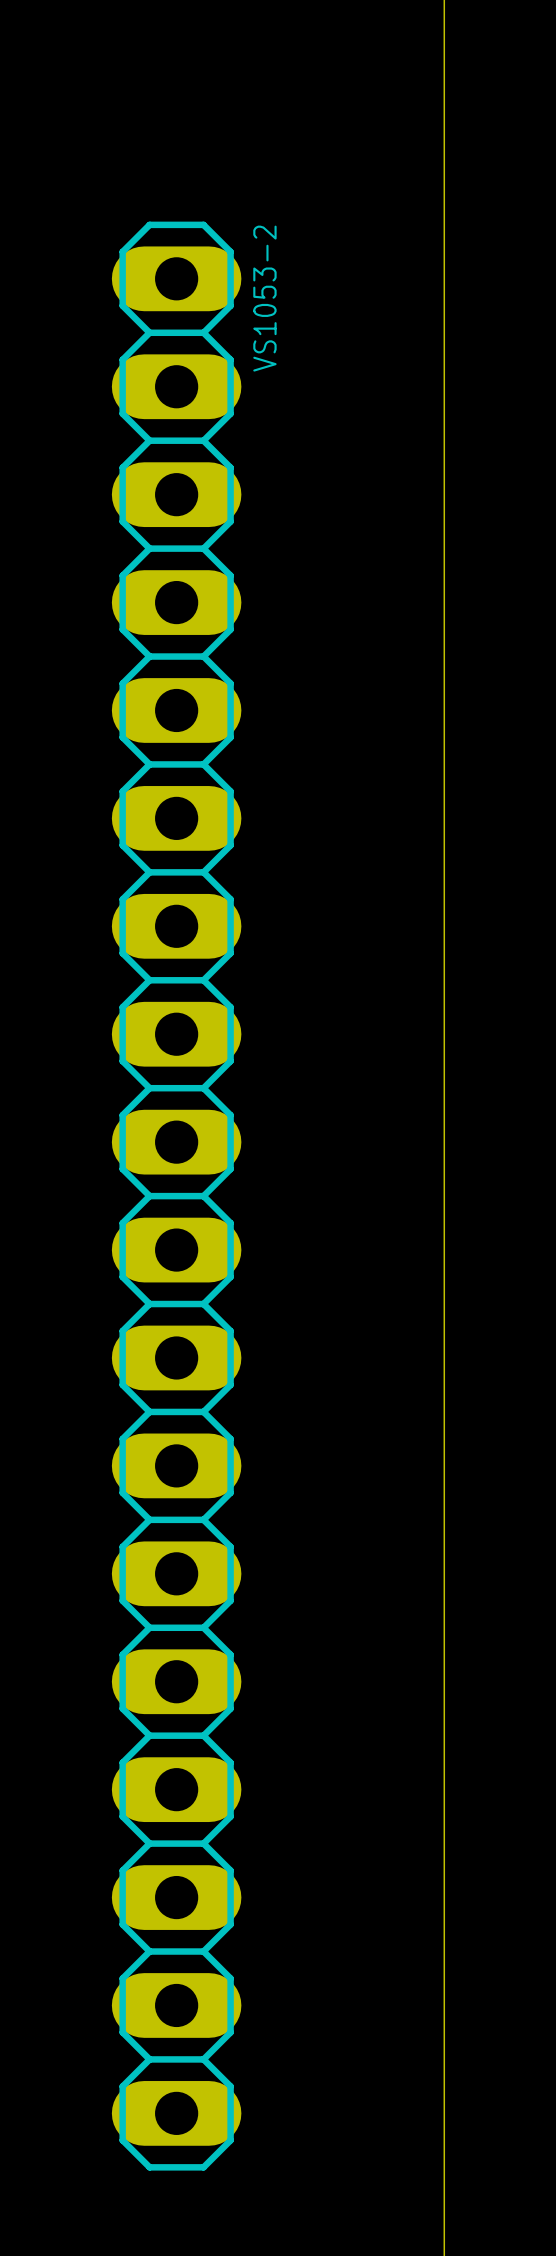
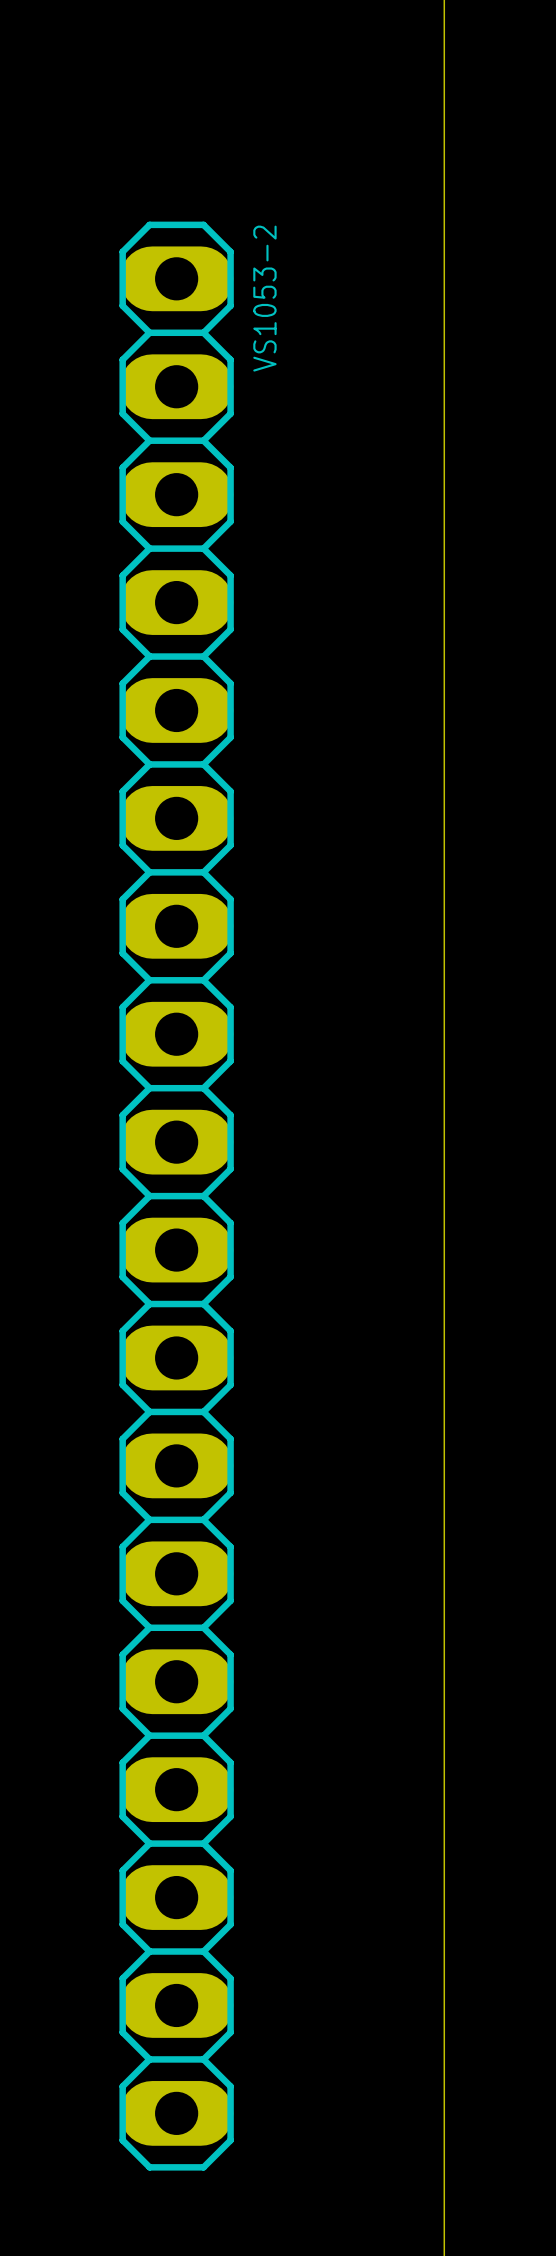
VS1053-2 footprint: [111, 221, 242, 2171] -> [119, 221, 234, 2171]

